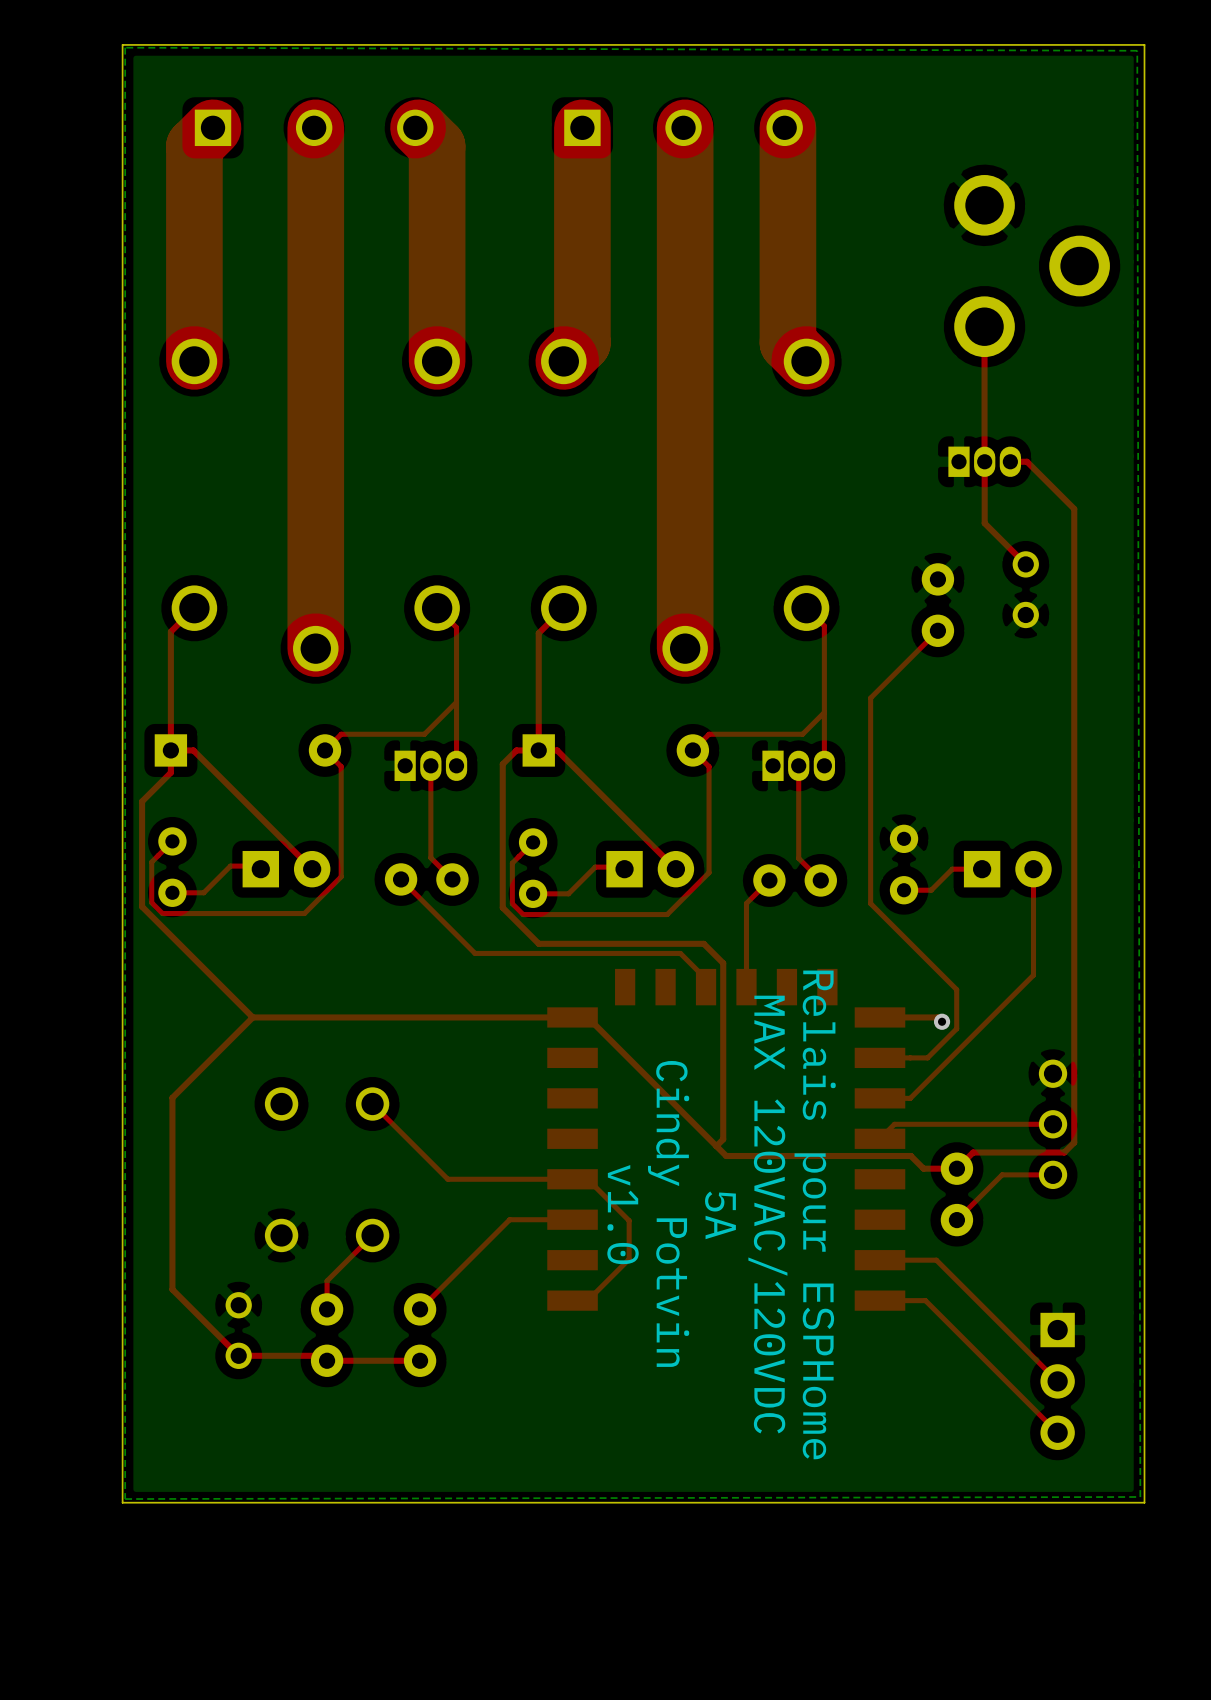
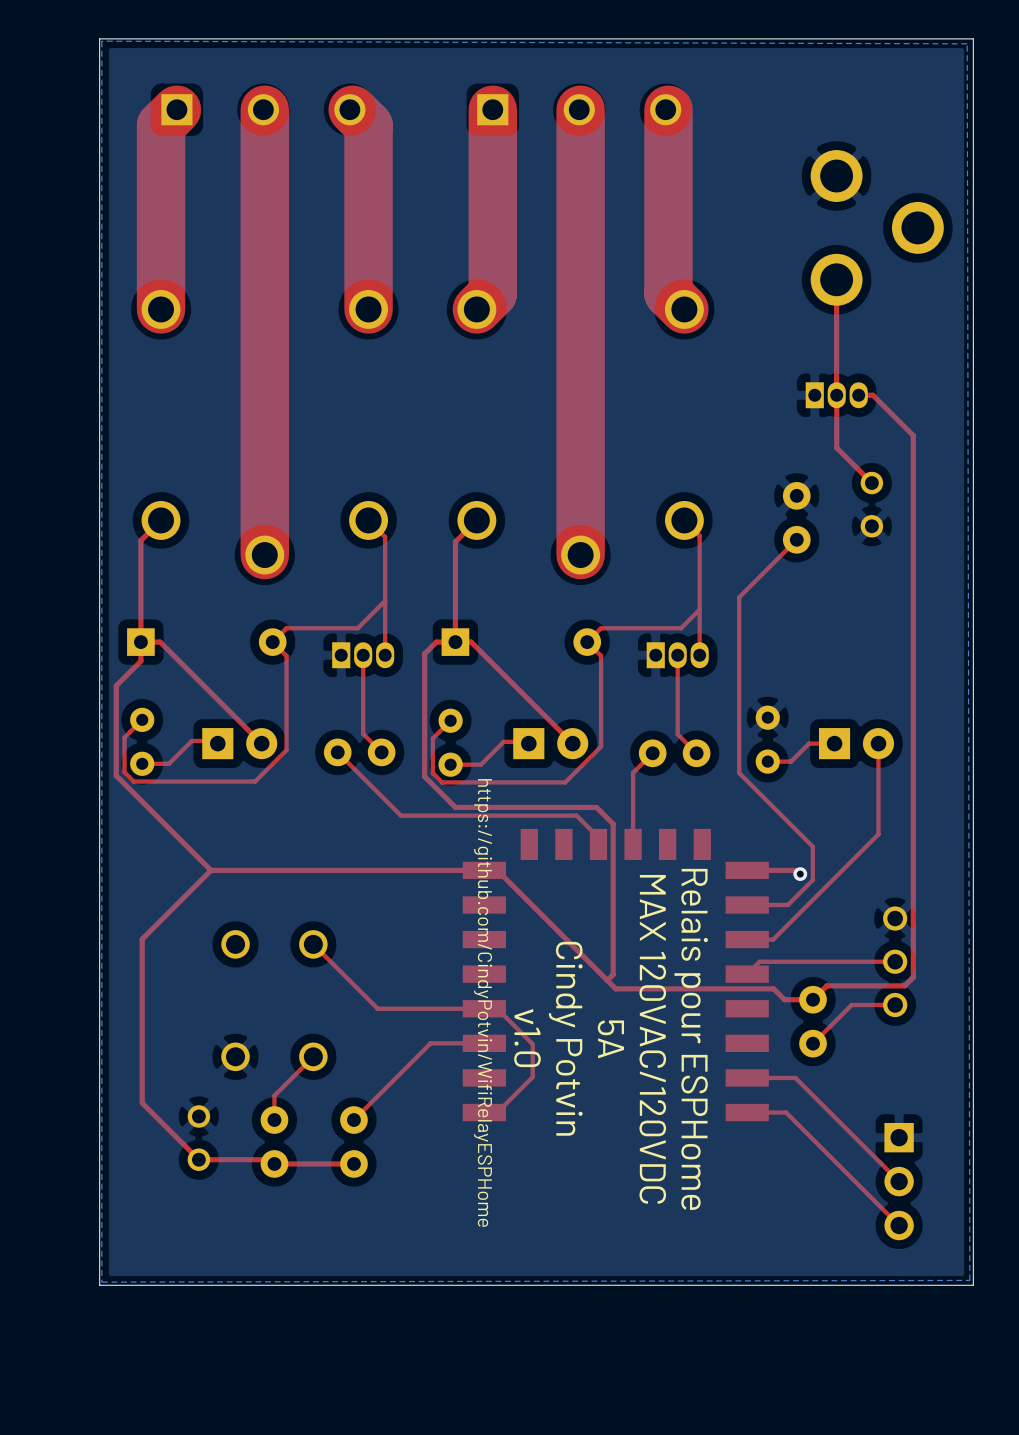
text: none -> https://github.com/CindyPotvin/WifiRelayESPHome (483, 1002)

